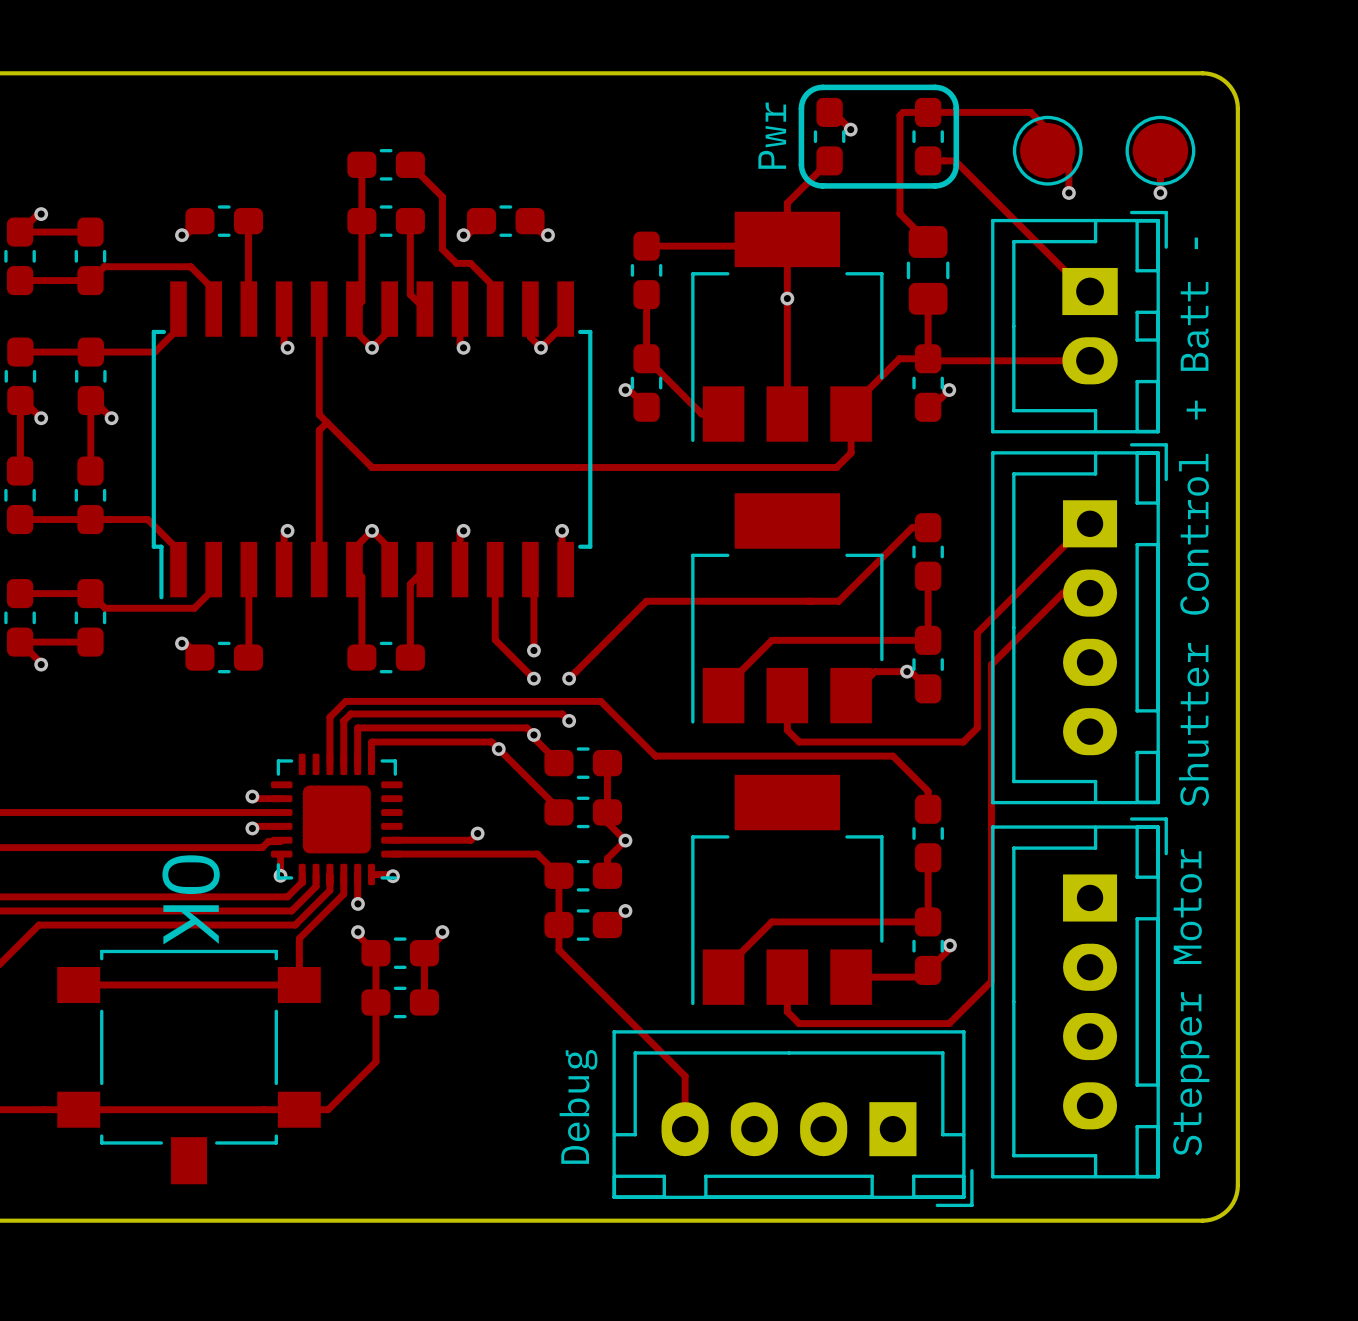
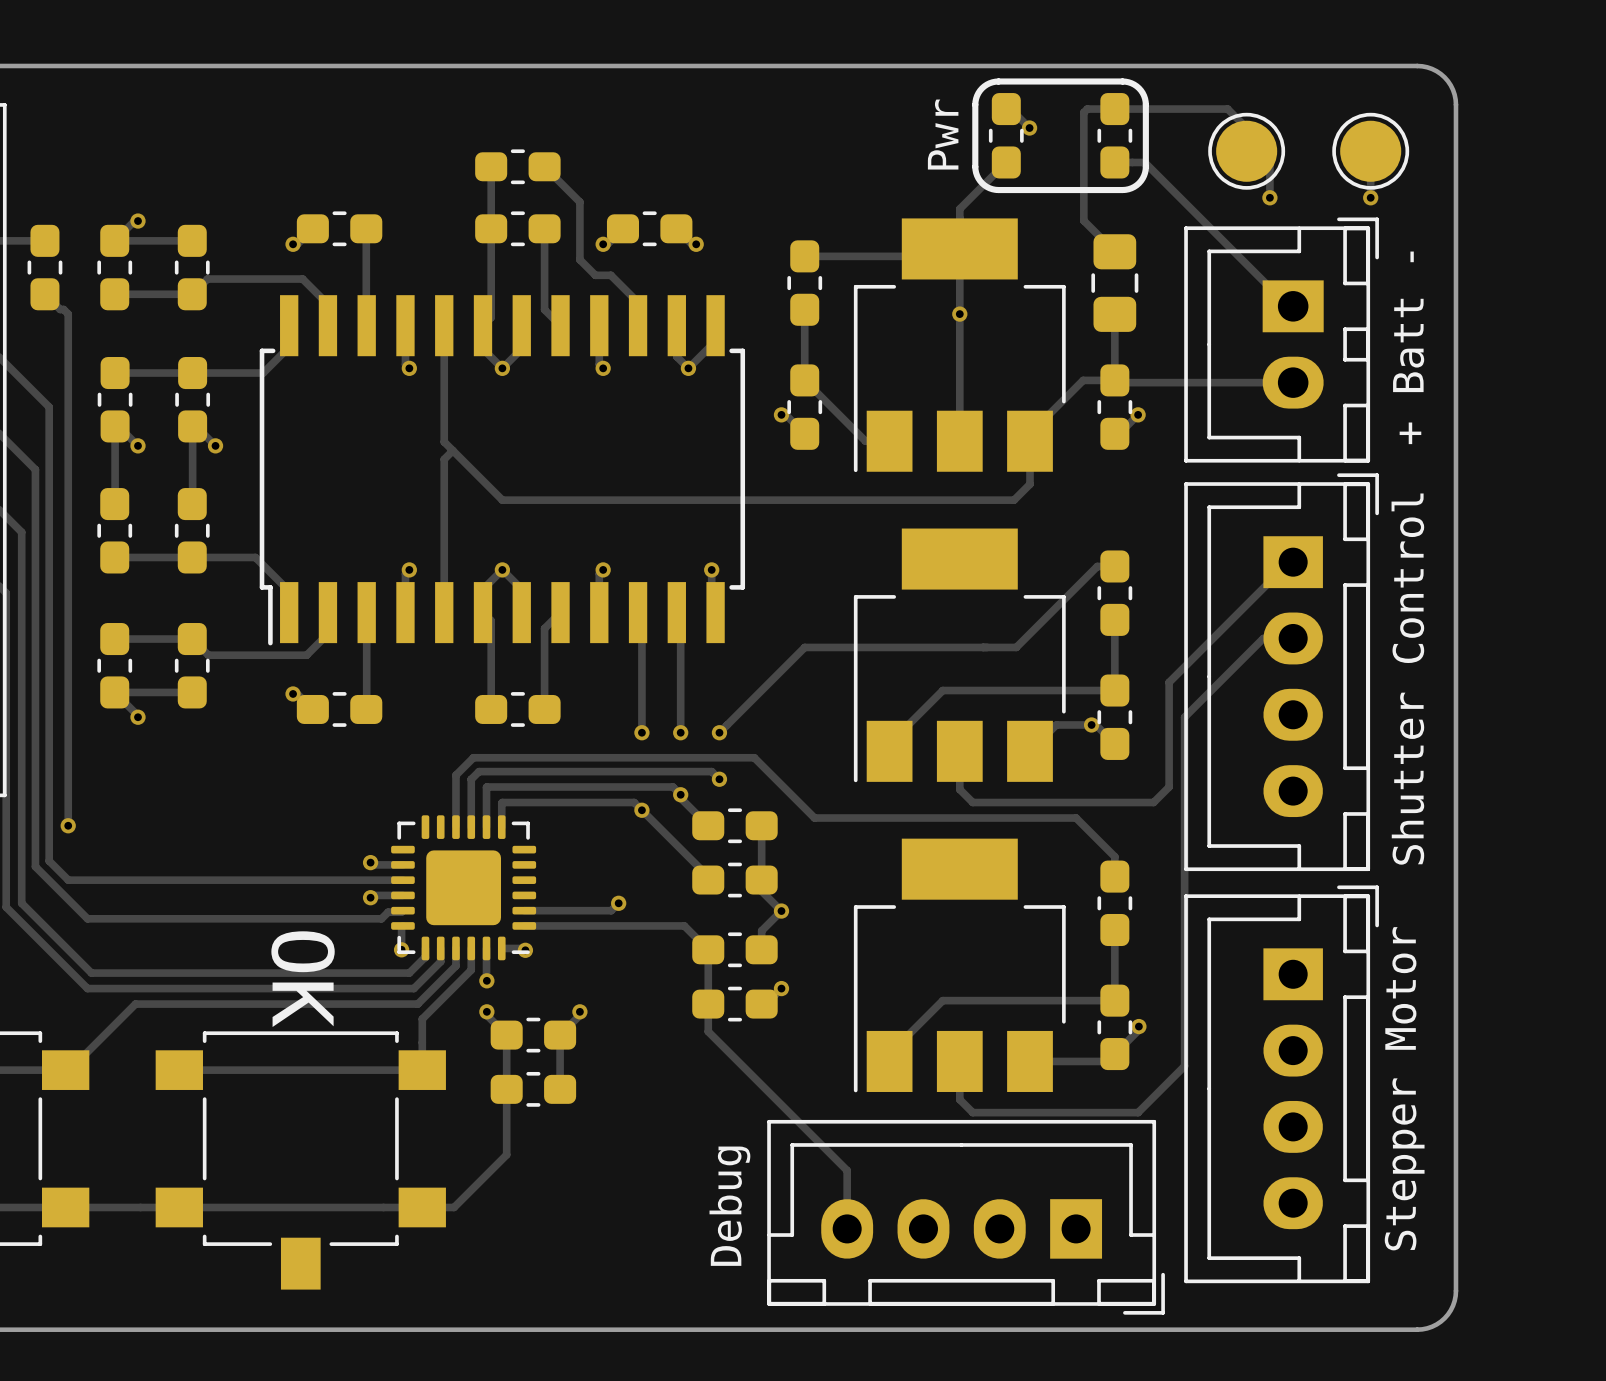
track: (495, 569) (495, 639) (533, 678) -> (680, 701) (680, 732)
track: none -> (641, 616) (641, 732)
via position: (533, 650) -> (641, 732)

